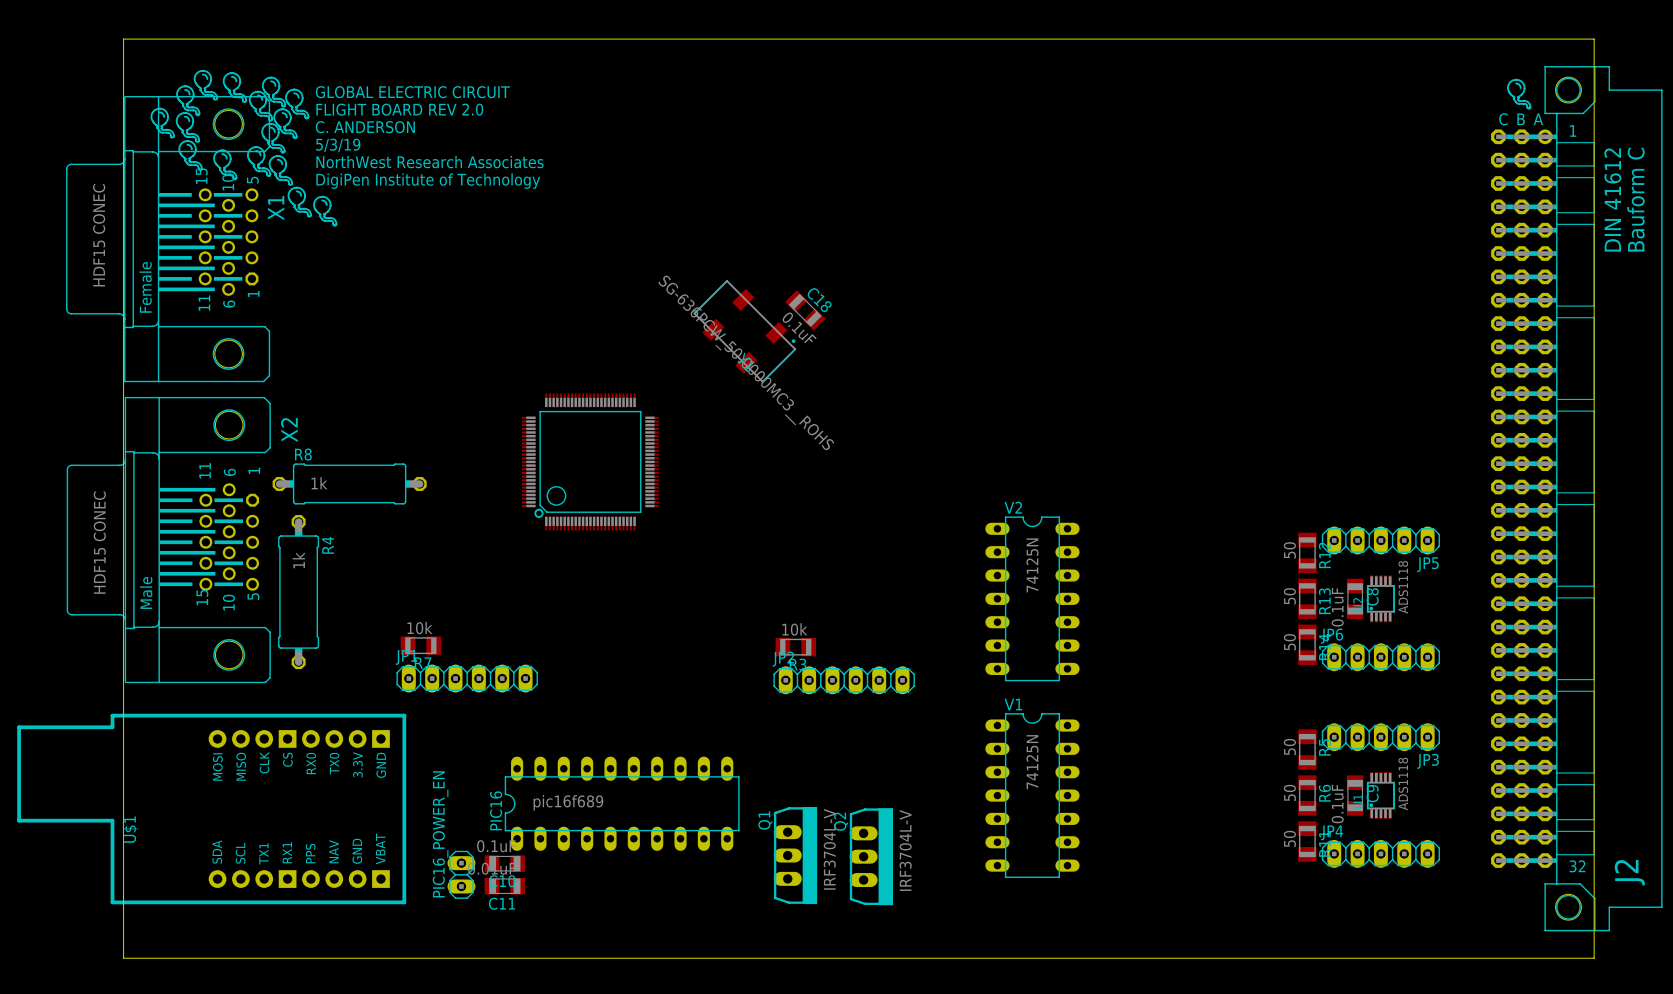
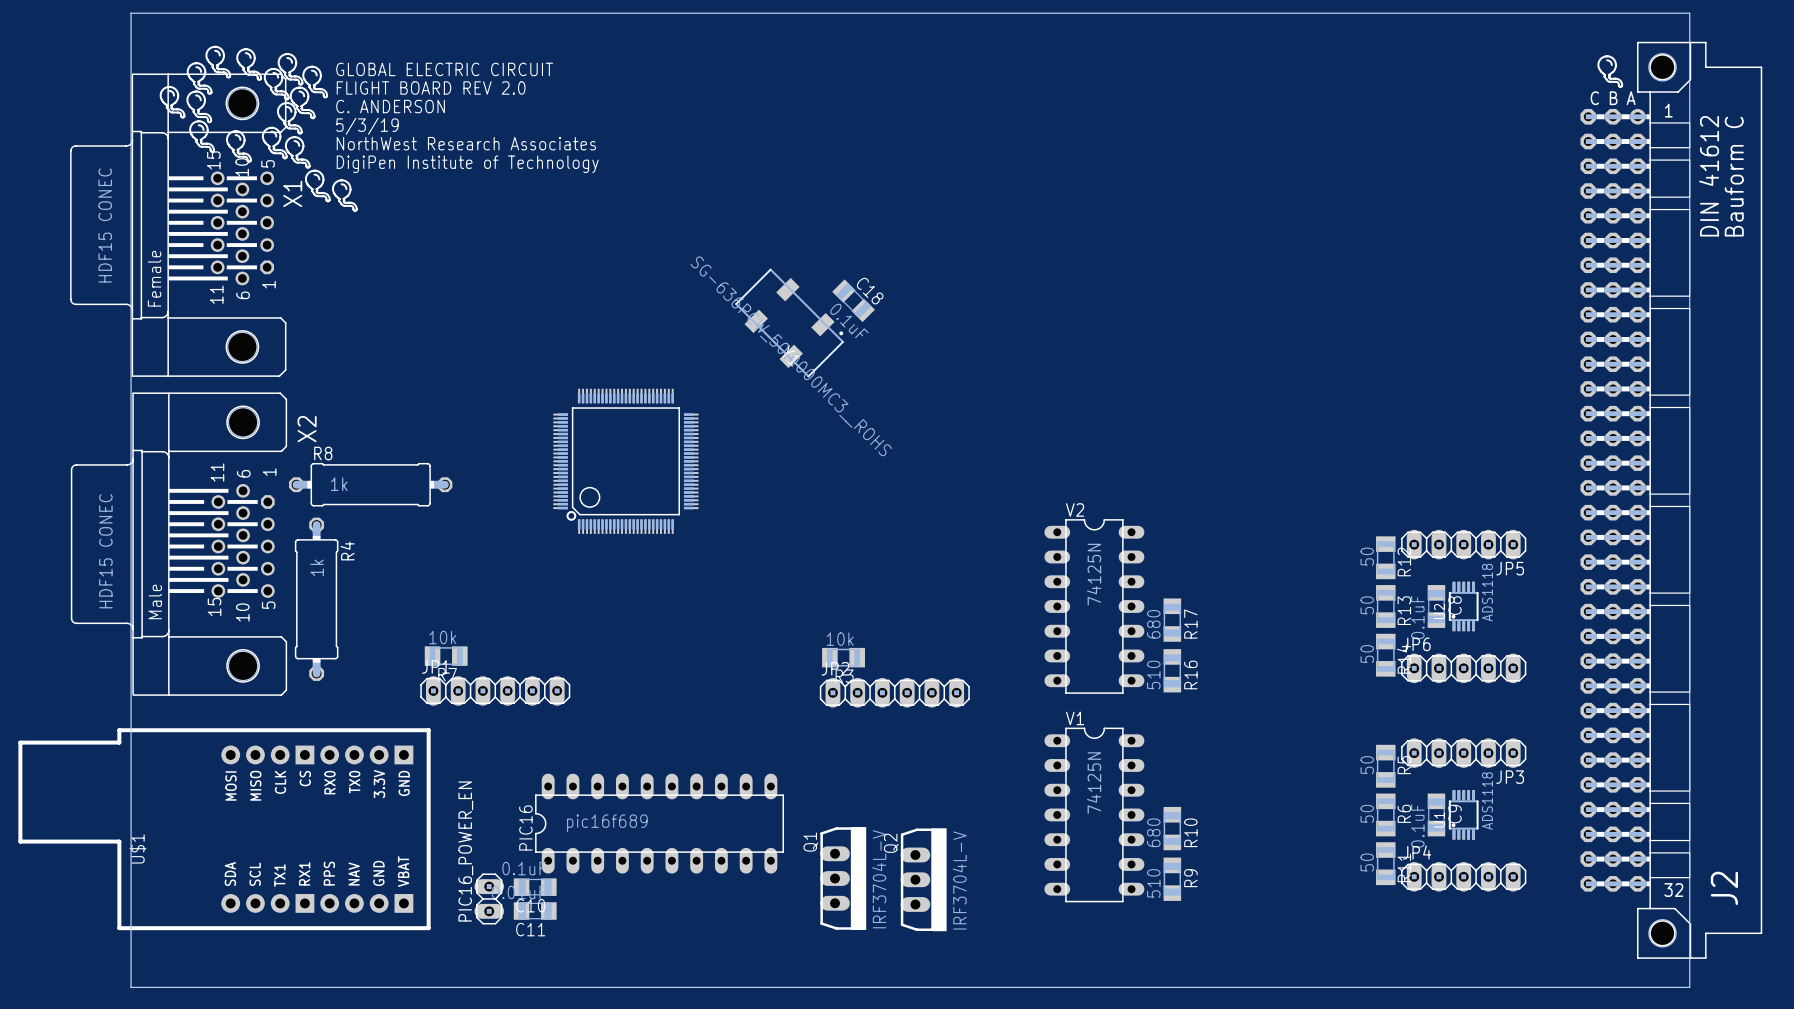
R17: none -> 680 (1172, 620)
R16: none -> 510 (1172, 670)
R10: none -> 680 (1172, 828)
R9: none -> 510 (1172, 879)

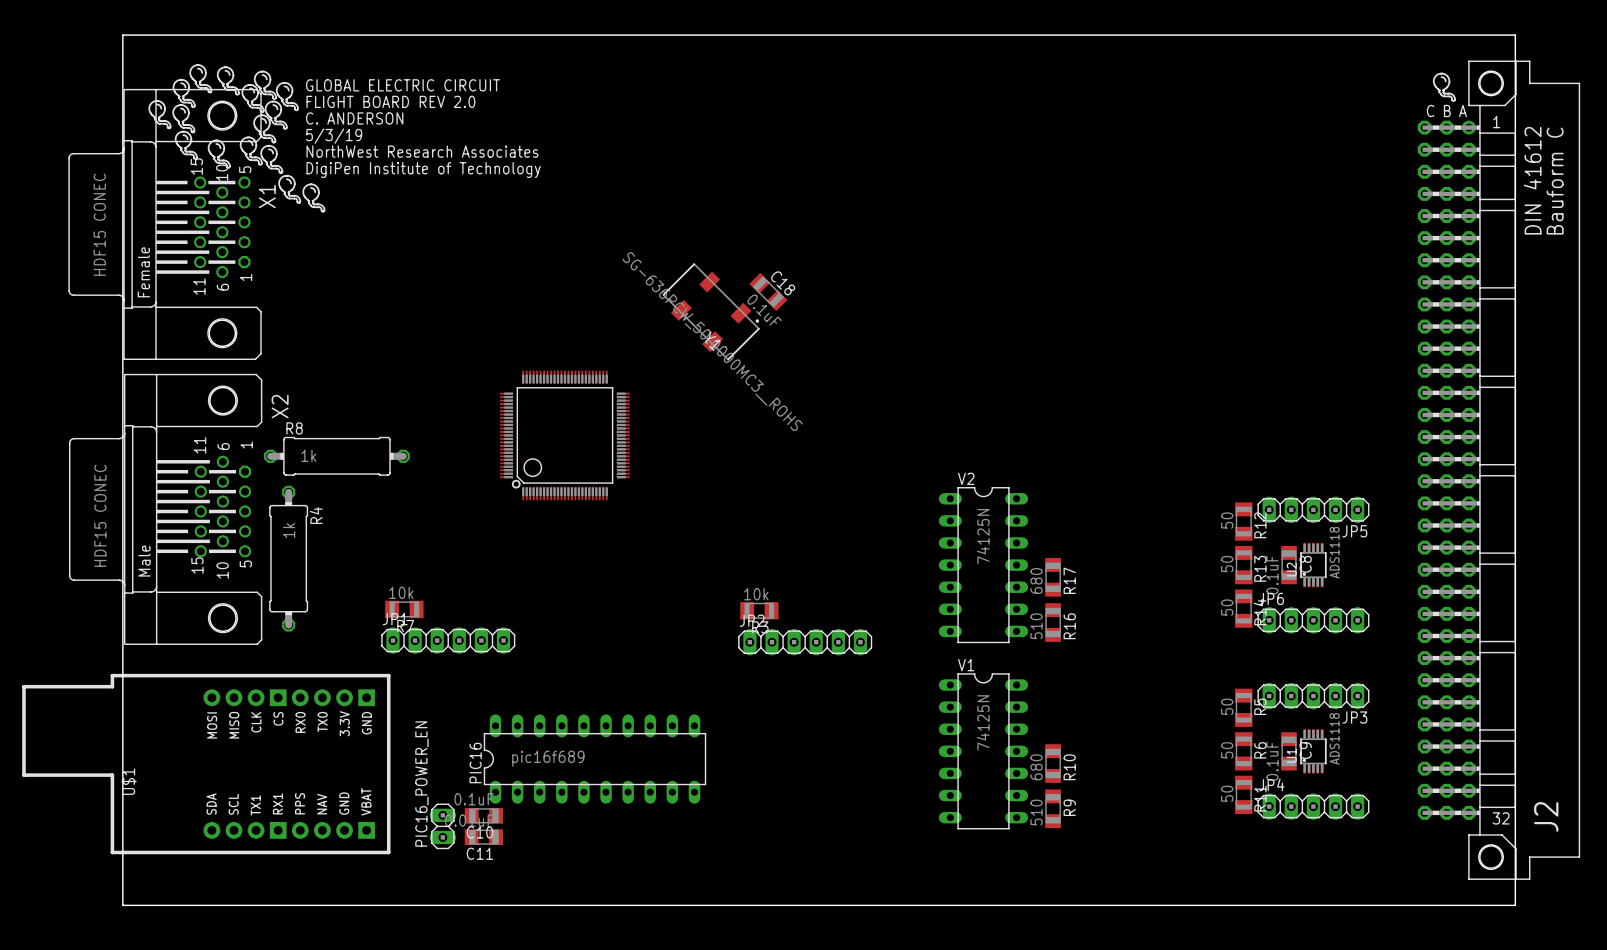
Q1: IRF3704L-V (843, 878) -> none
Q2: IRF3704L-V (923, 879) -> none

